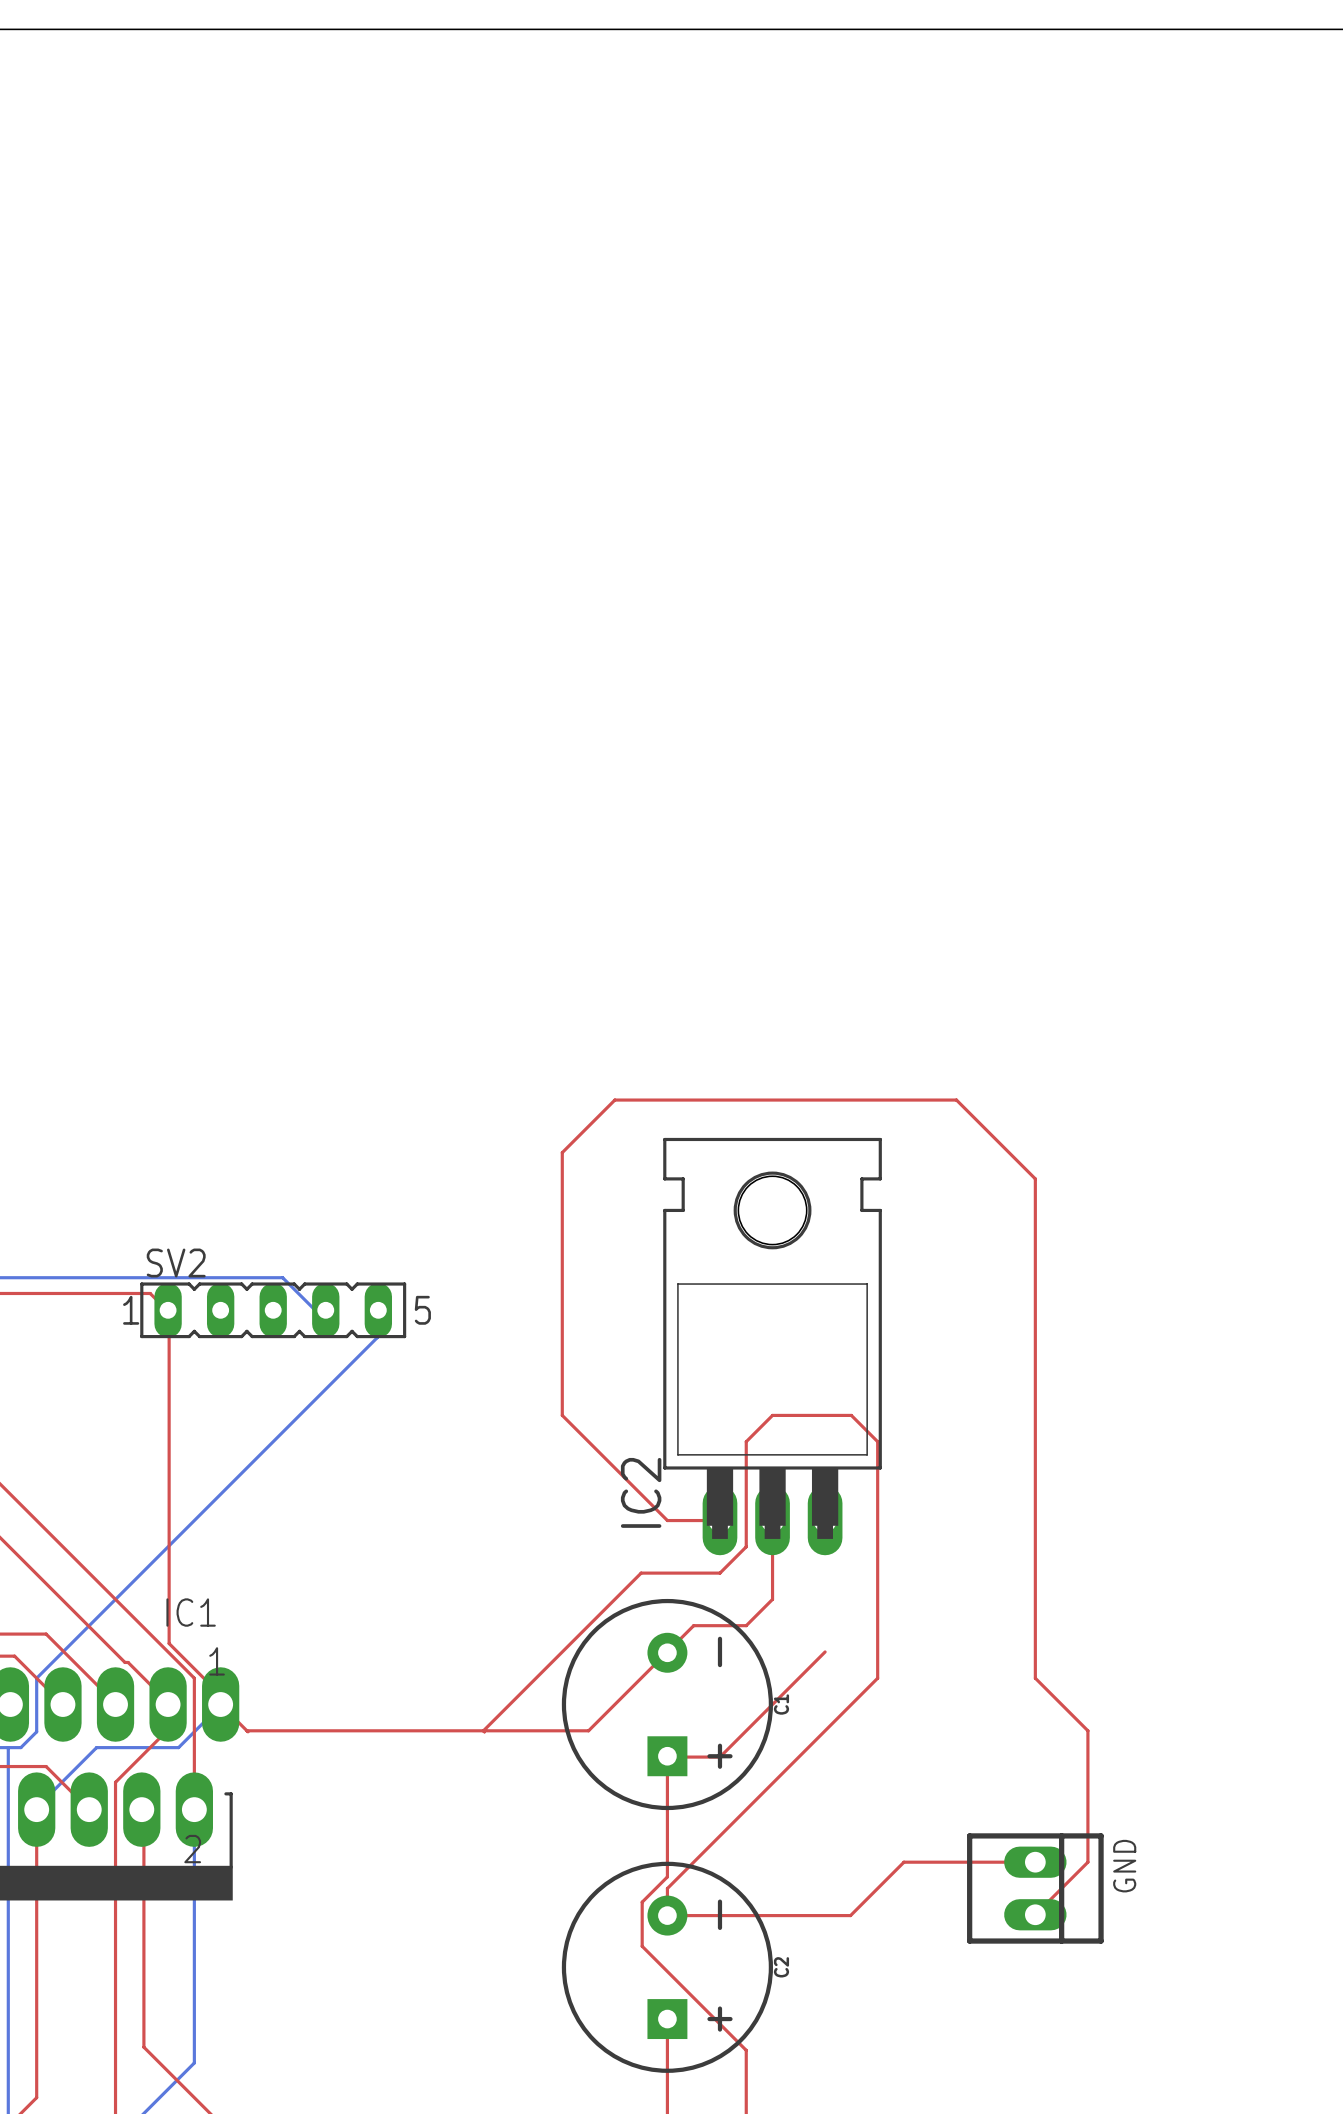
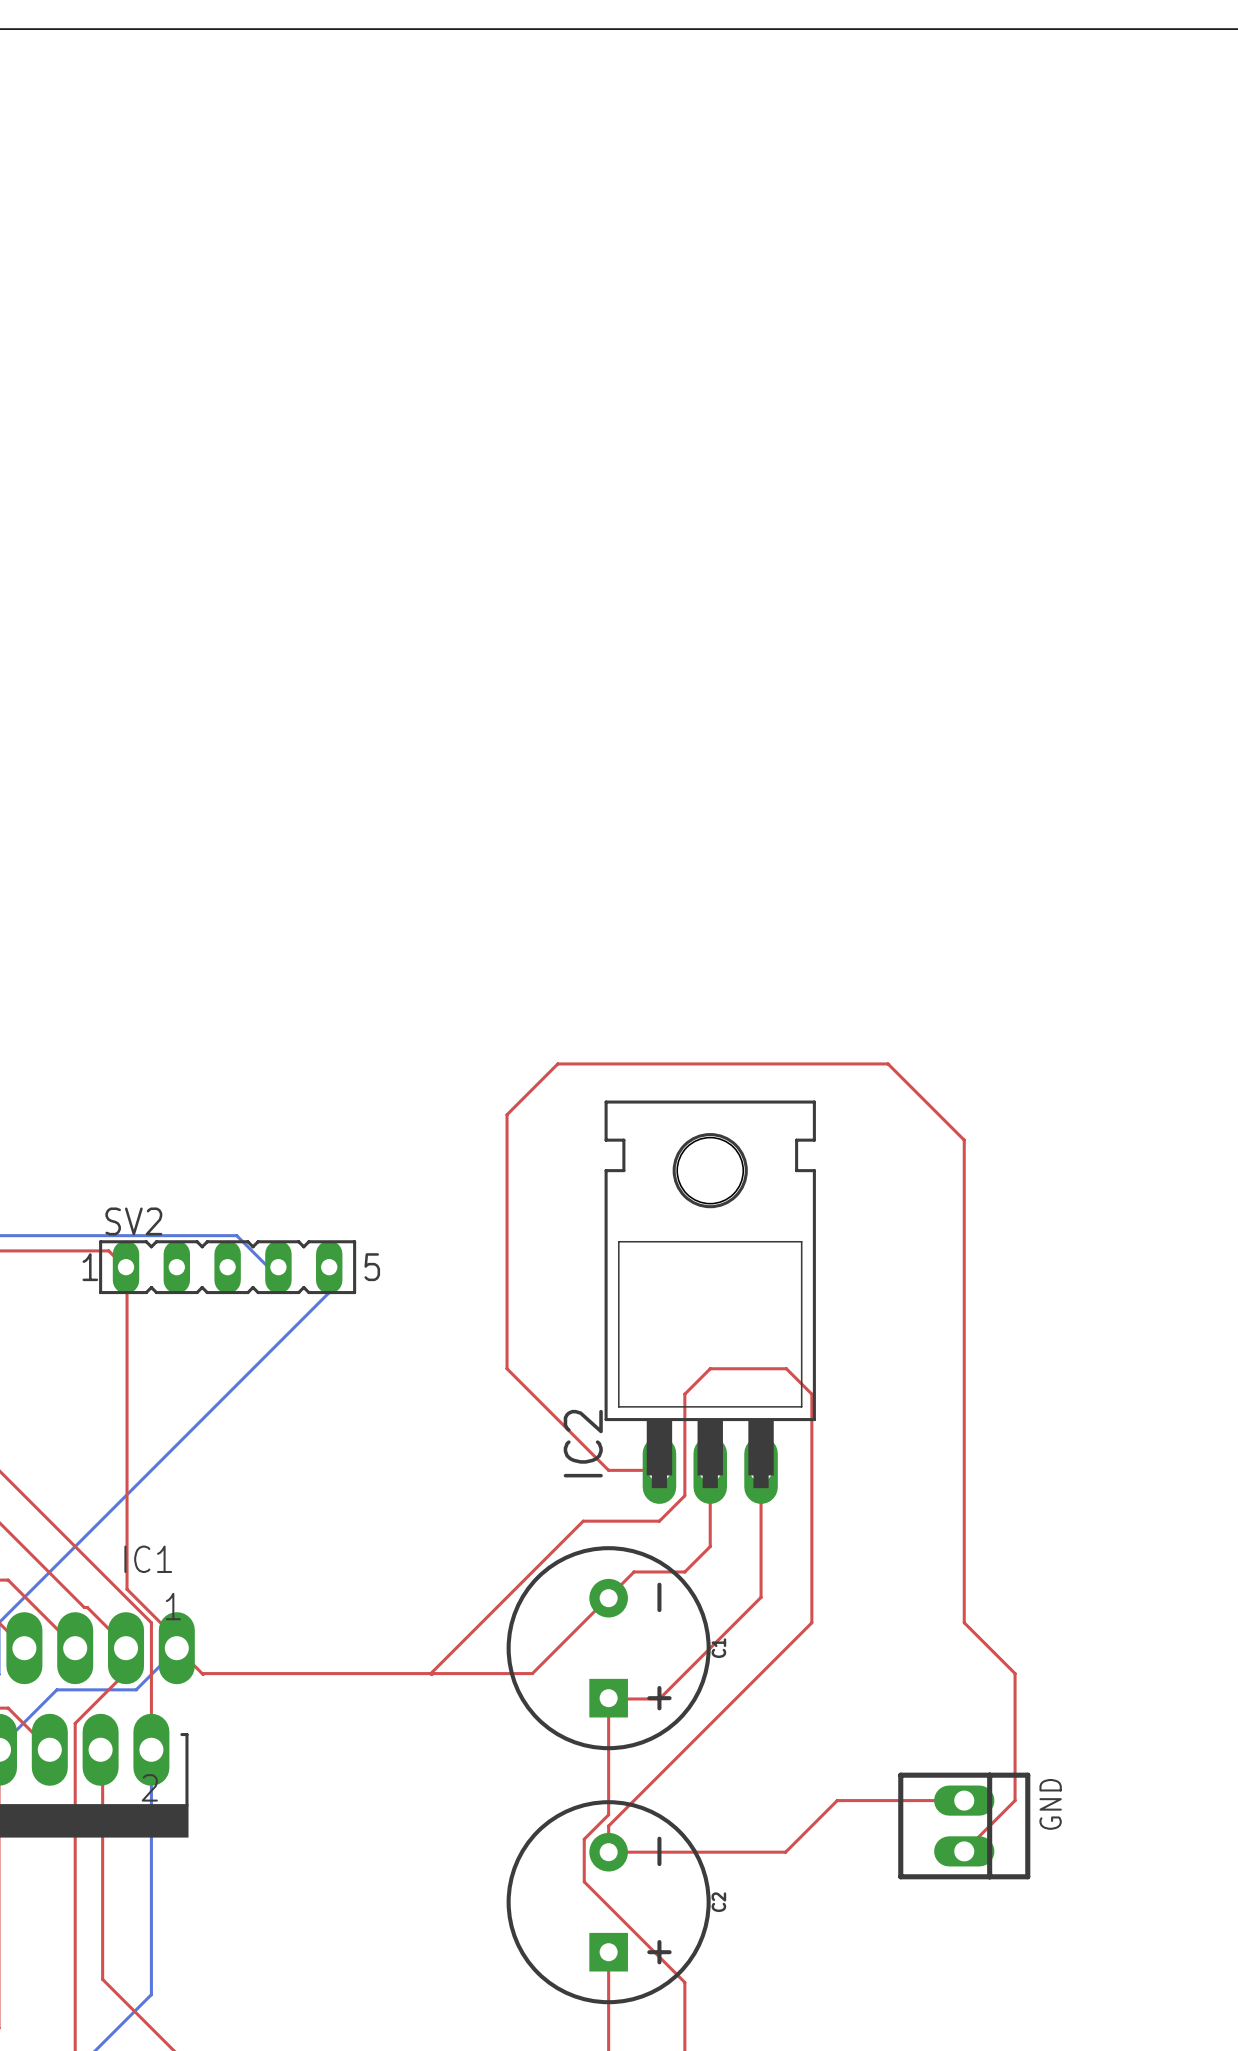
top track: none -> (761, 1470) (761, 1597)

